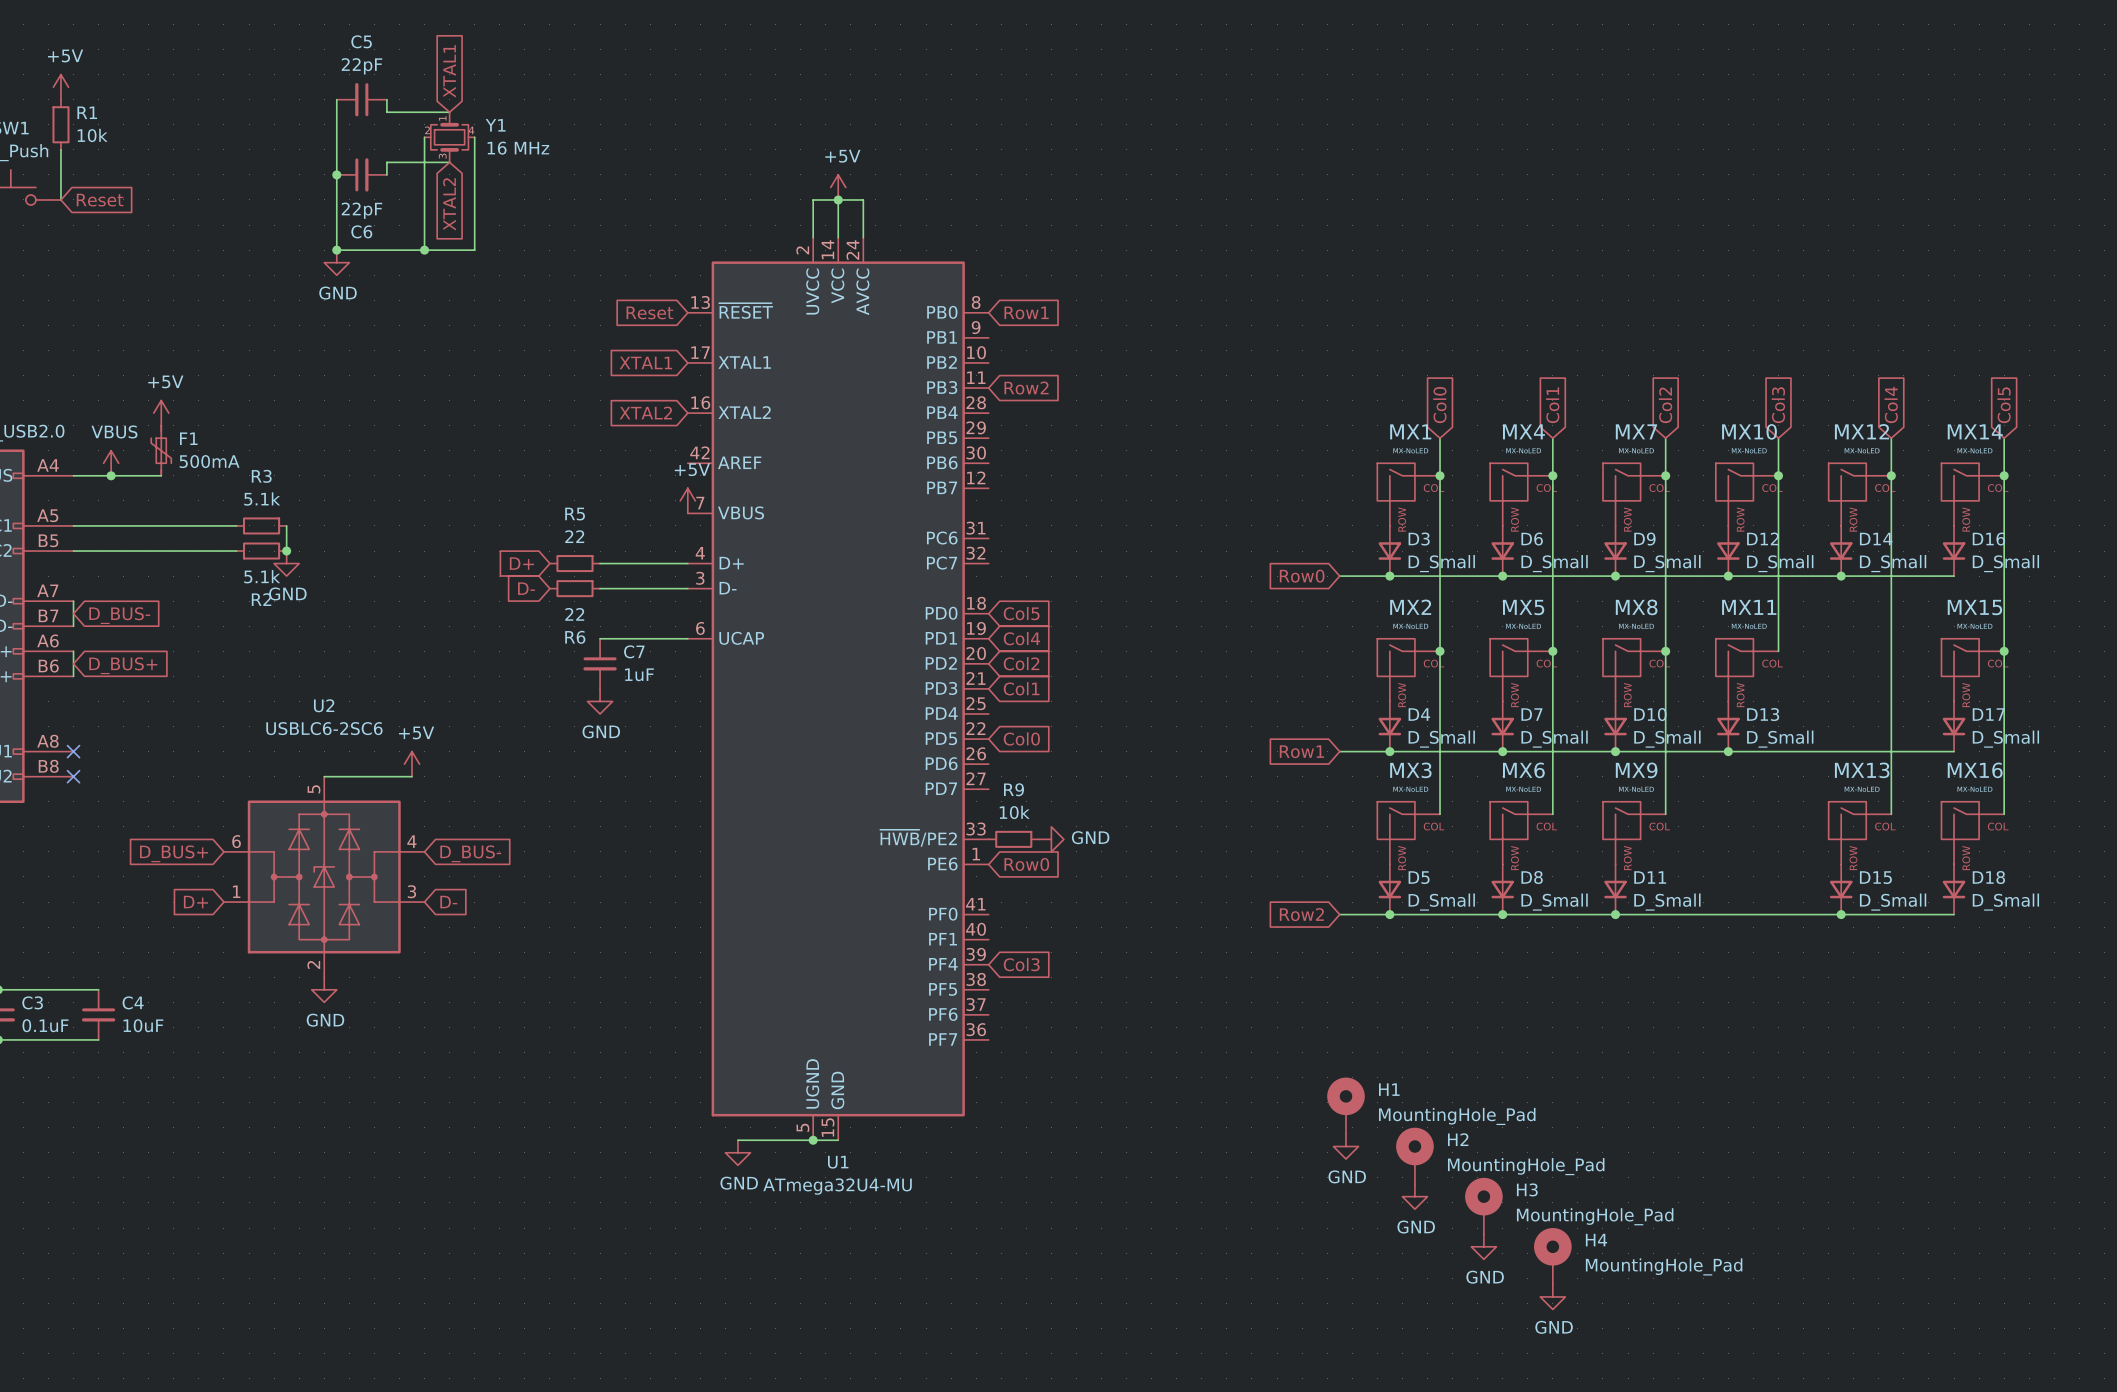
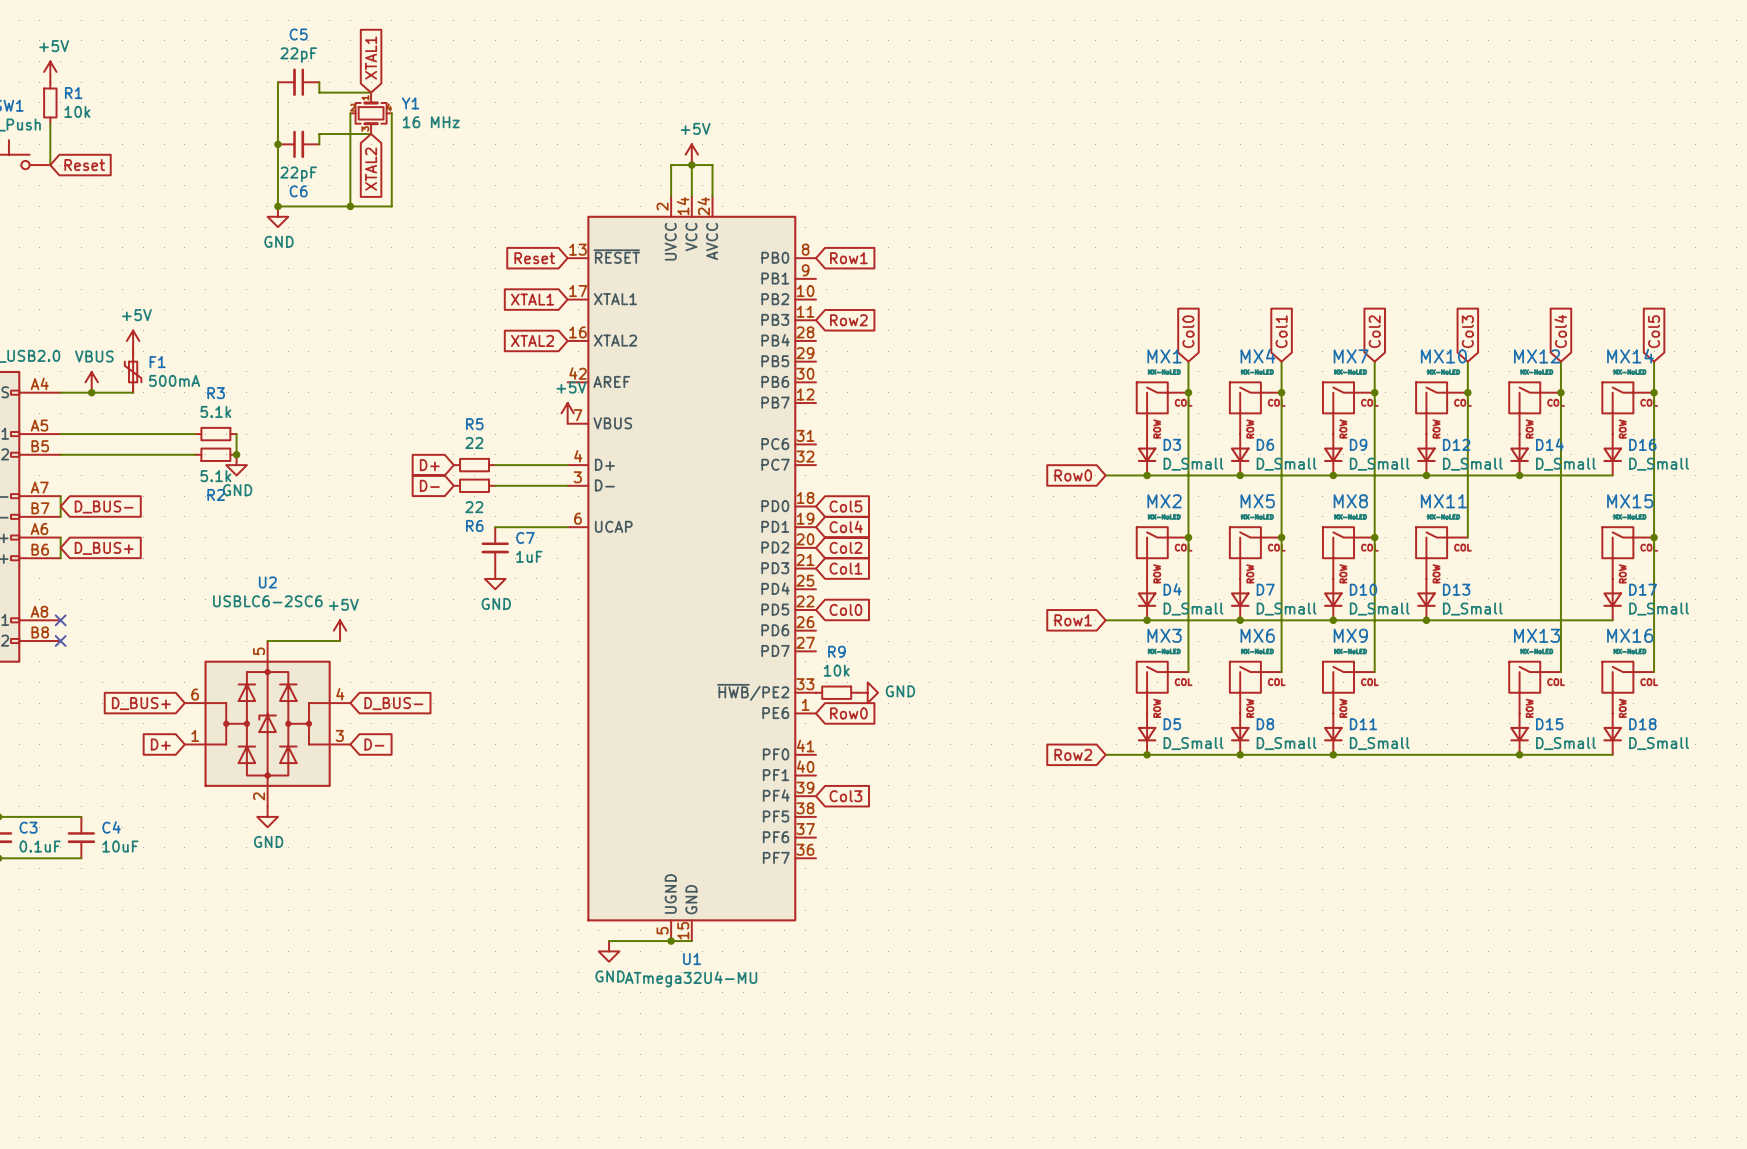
H1: MountingHole_Pad (1345, 1105) -> none
power symbol: GND (1345, 1146) -> none
H2: MountingHole_Pad (1414, 1155) -> none
power symbol: GND (1414, 1196) -> none
H3: MountingHole_Pad (1483, 1206) -> none
power symbol: GND (1483, 1246) -> none
H4: MountingHole_Pad (1552, 1256) -> none
power symbol: GND (1552, 1296) -> none

